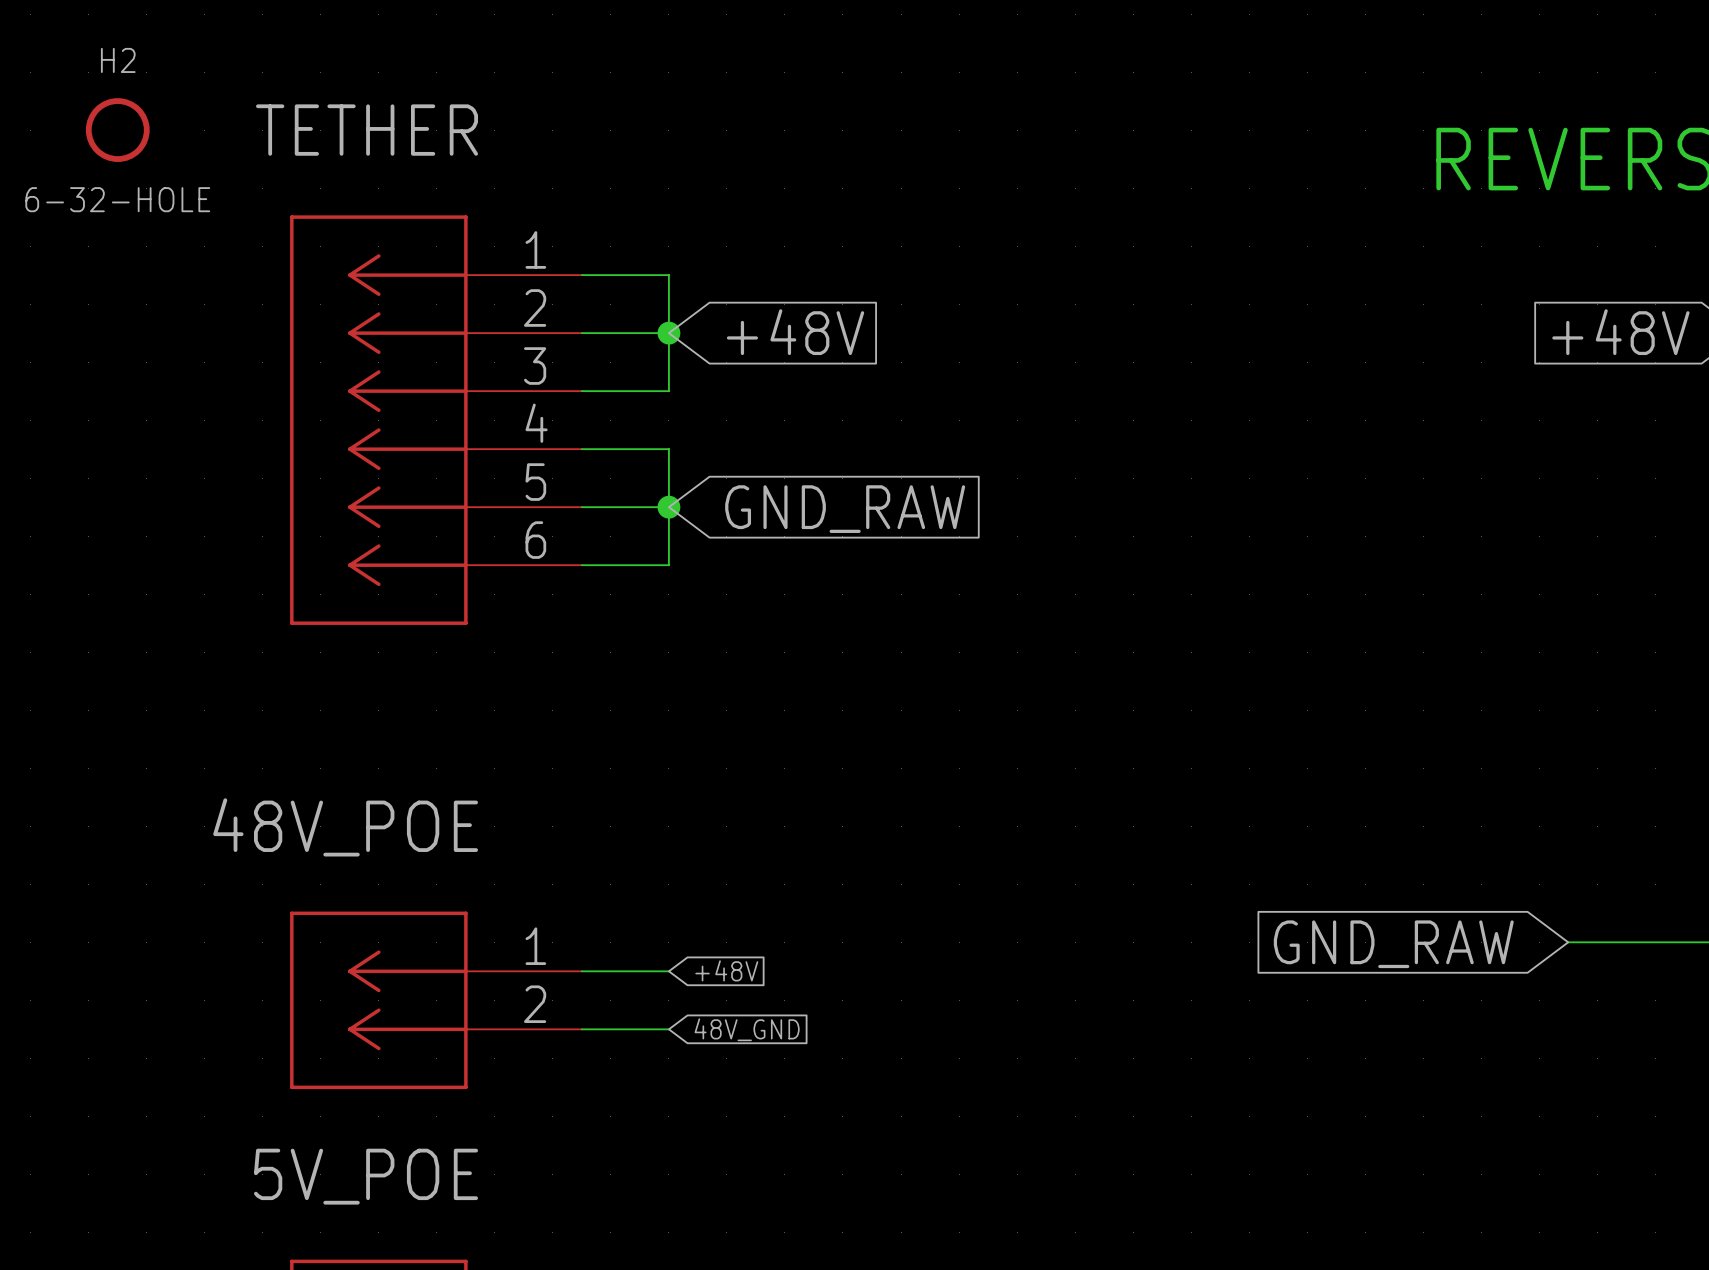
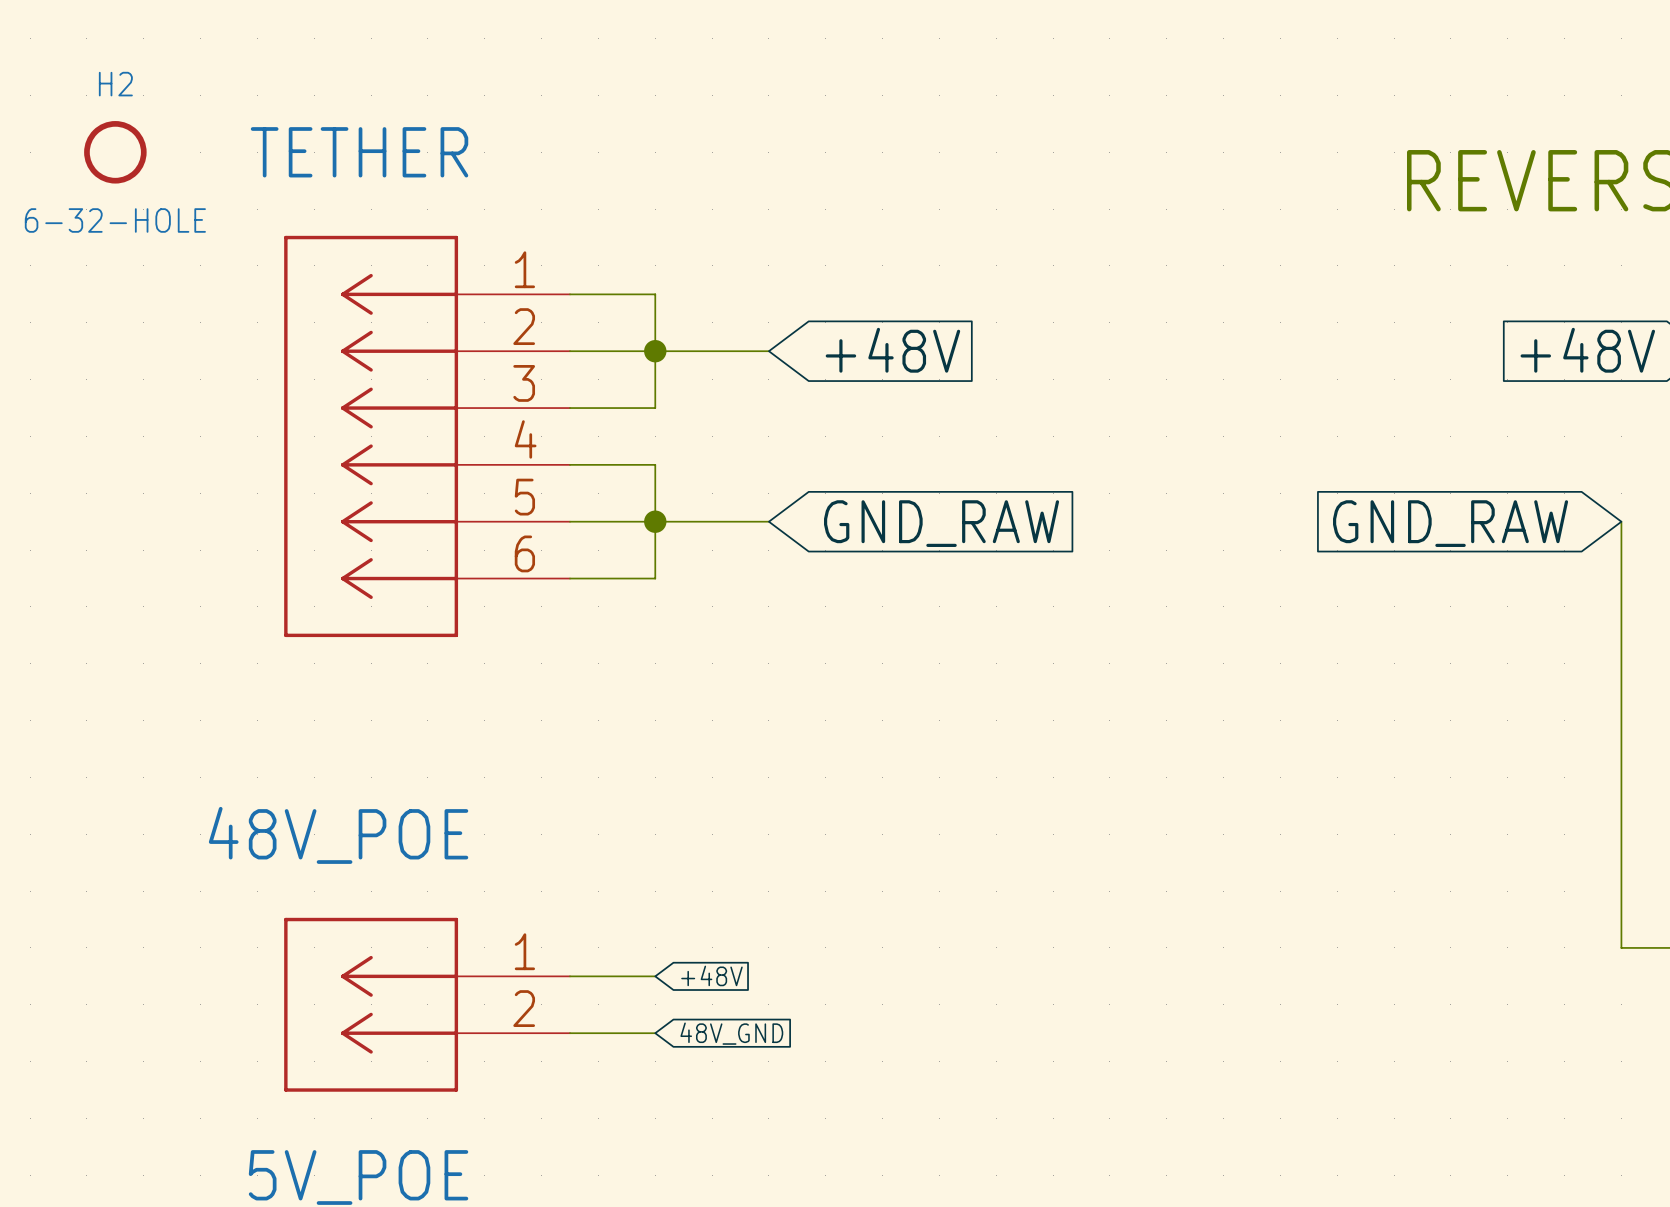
global label position: +48V (795, 332) -> +48V (892, 350)
wire: none -> (655, 351) (768, 351)
wire: none -> (655, 521) (768, 521)
global label position: GND_RAW (845, 509) -> GND_RAW (941, 523)
wire: (1568, 942) (1655, 942) -> (1621, 521) (1621, 947)
global label position: GND_RAW (1393, 944) -> GND_RAW (1450, 523)

